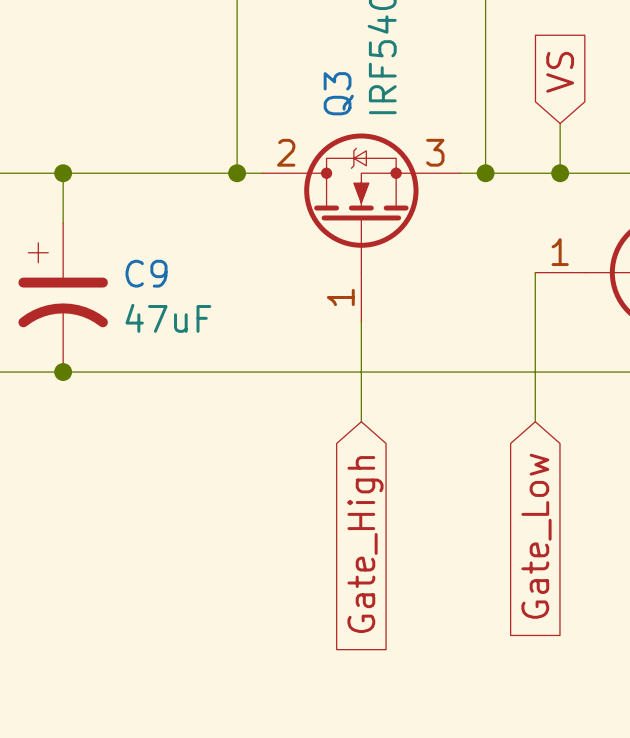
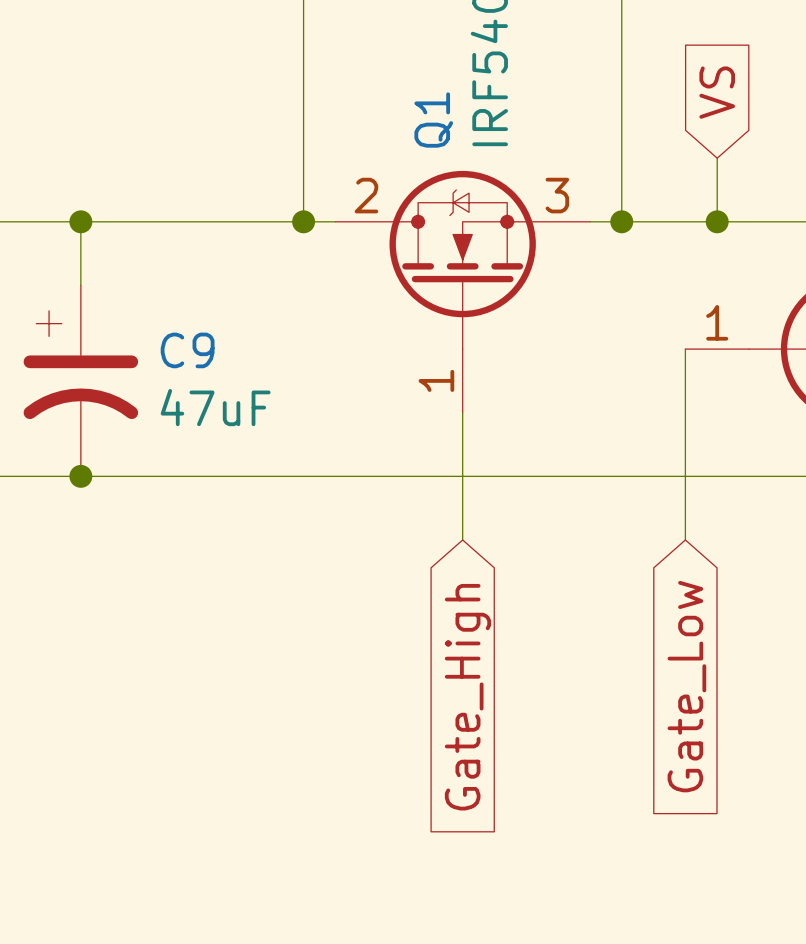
Q3 name: Q3 (338, 93) -> Q1 (433, 120)

